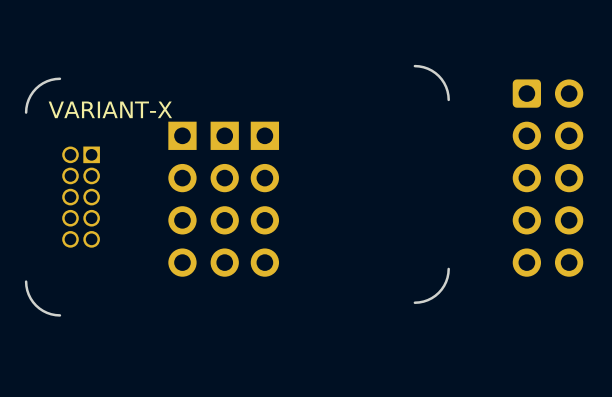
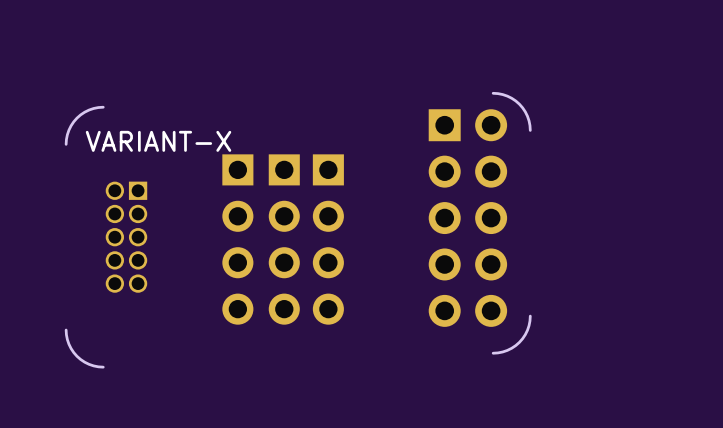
part: (547, 178) -> none
part: none -> (467, 218)

